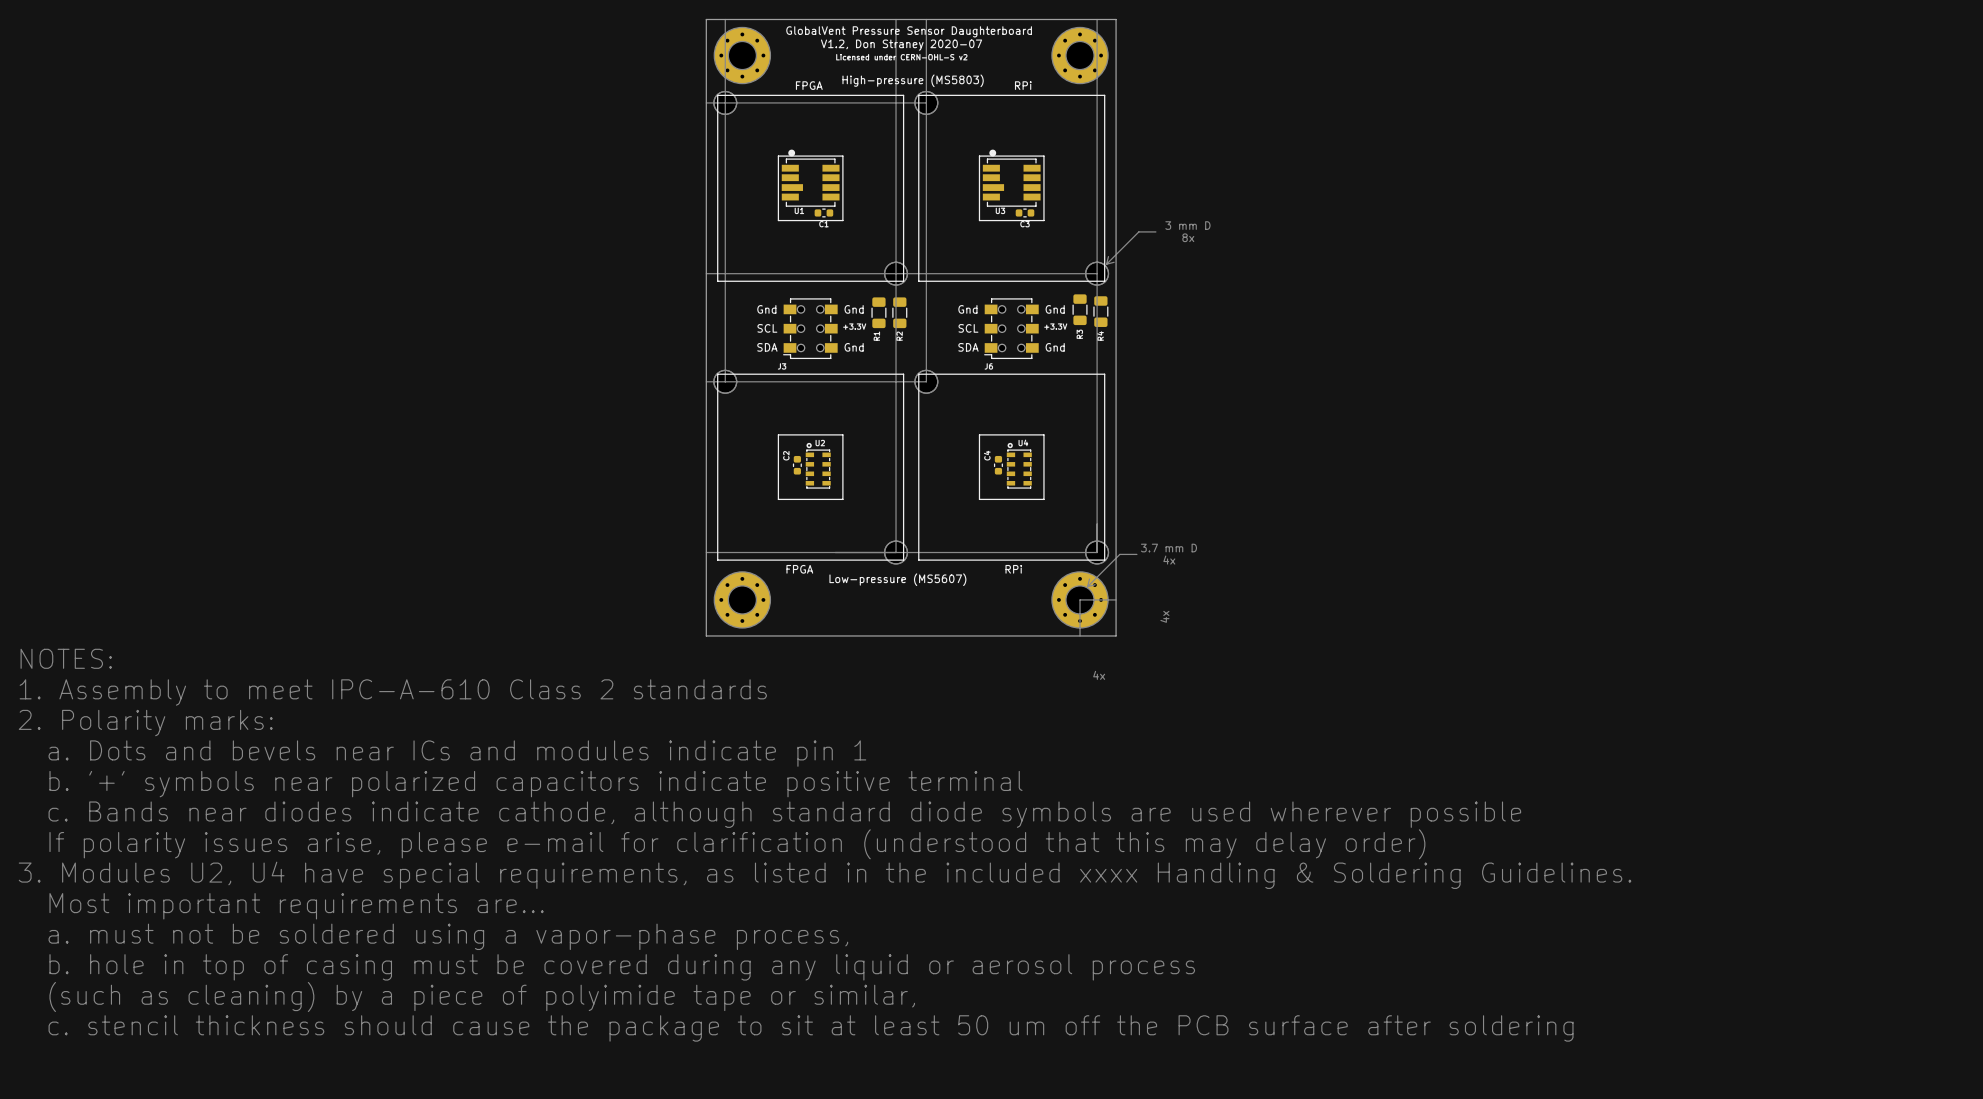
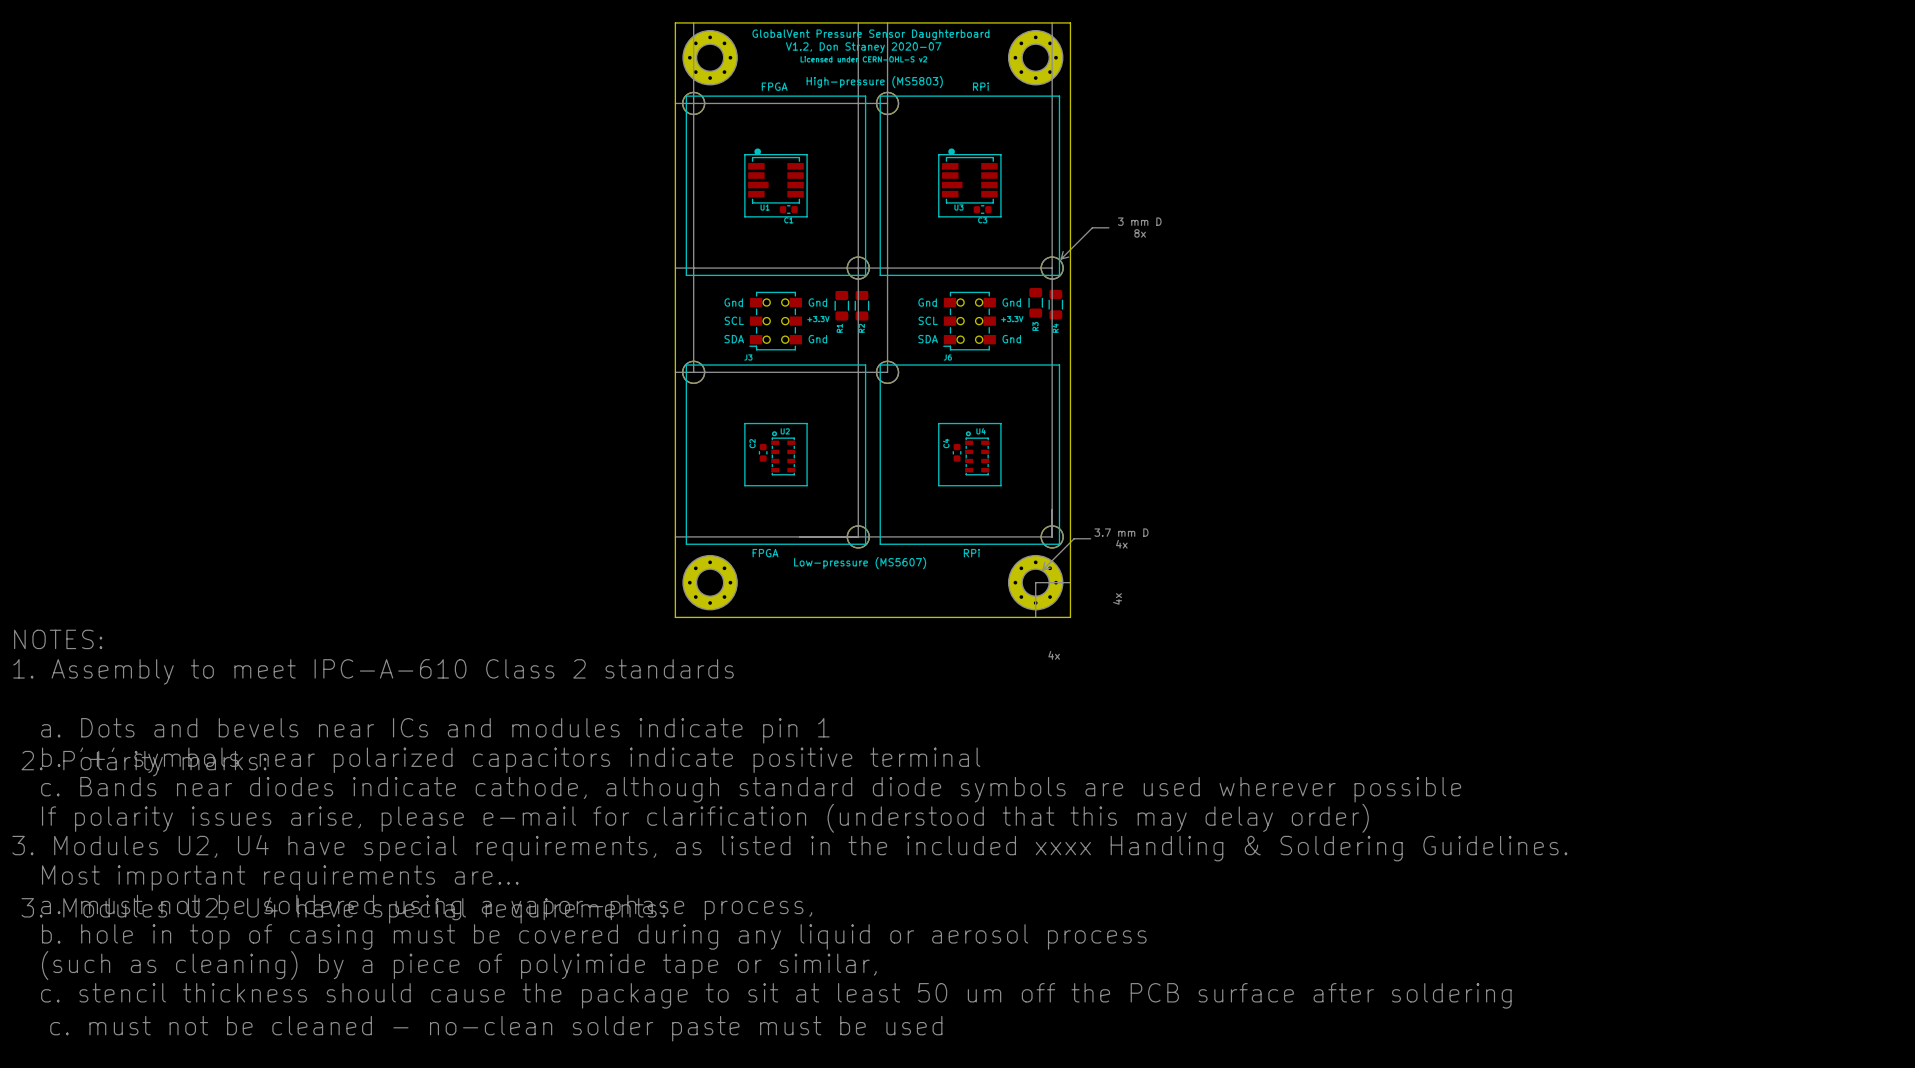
text position: 2. Polarity marks: (145, 723) -> 2. Polarity marks: (144, 763)
text: none -> 3. Modules U2, U4 have special requirements: (343, 910)
text: none -> c. must not be cleaned - no-clean solder paste must be used (496, 1028)

